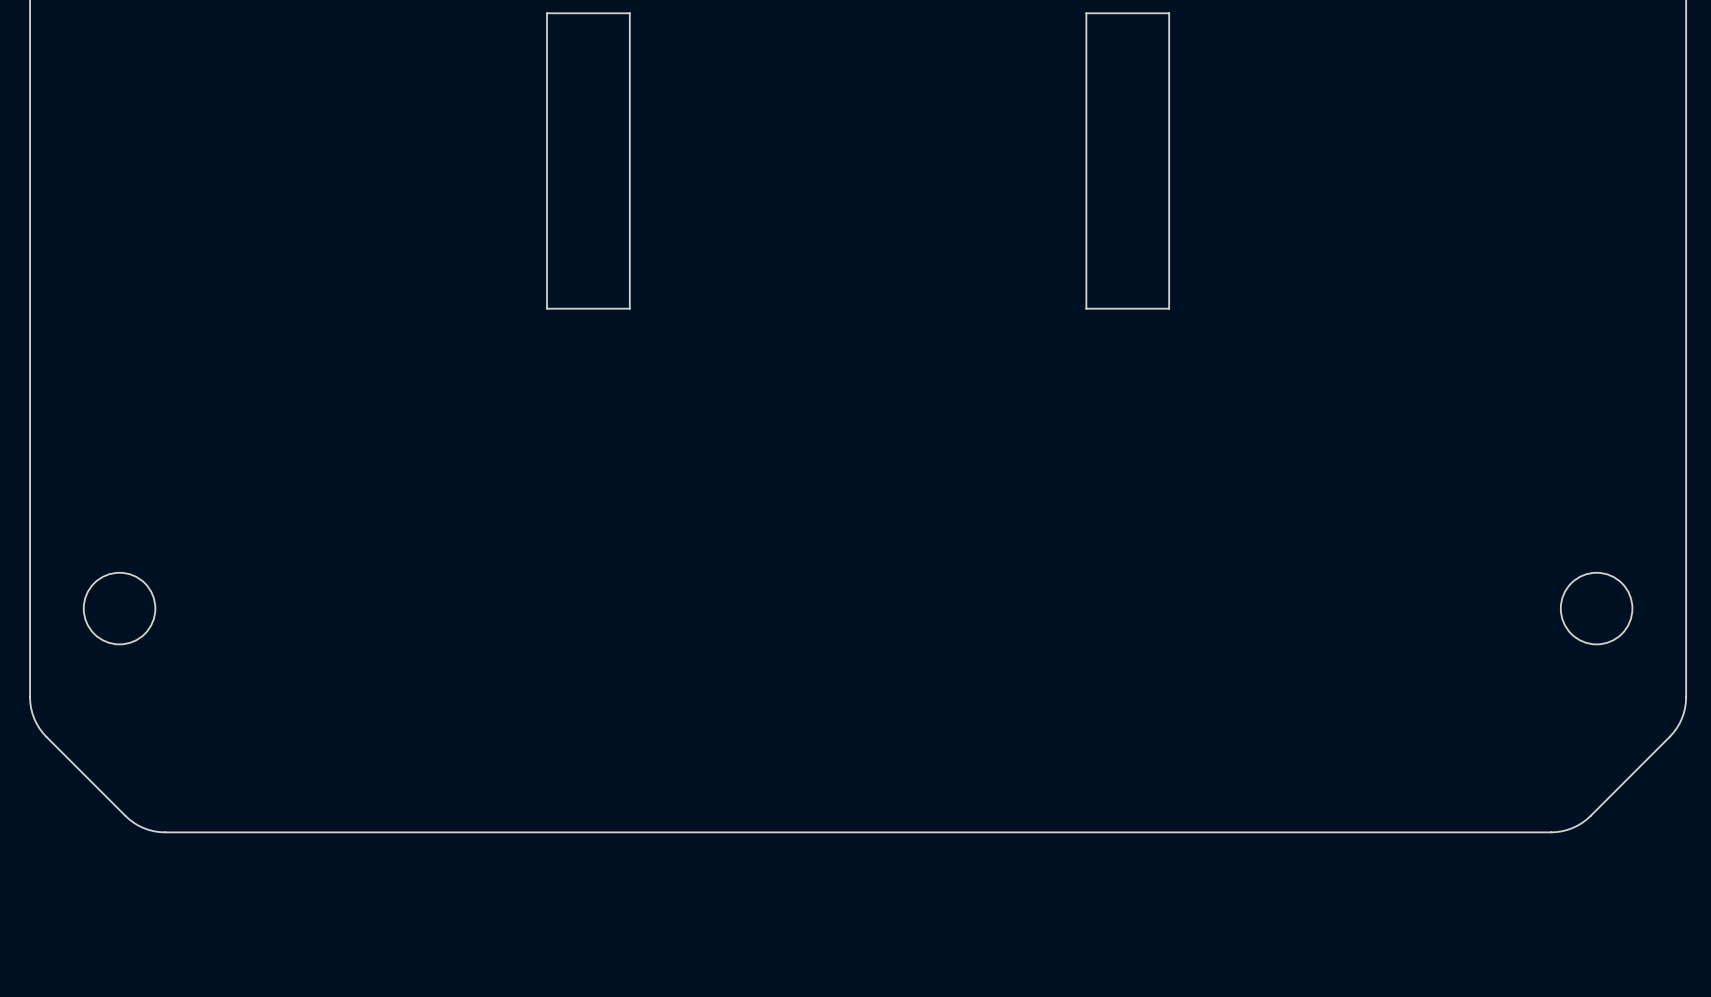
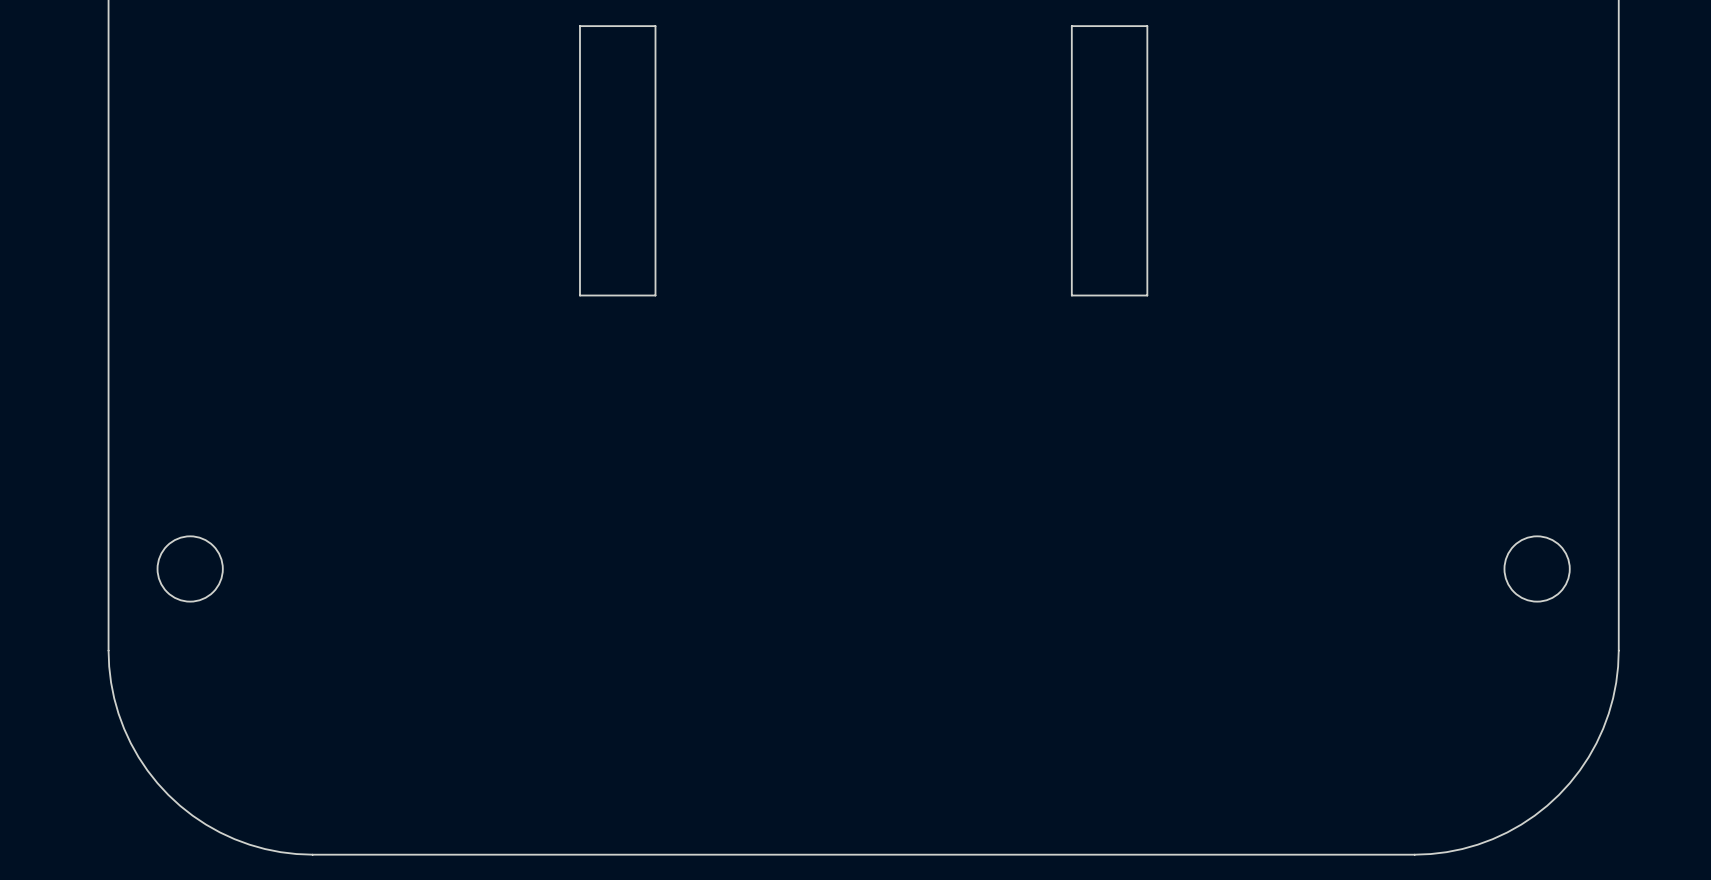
board edge: (30, 697) (32, 713) (42, 732) (125, 815) (143, 828) (165, 832) (1556, 832) (1572, 828) (1586, 819) (1669, 736) (1681, 718) (1686, 697) -> (108, 649) (111, 682) (124, 728) (138, 757) (168, 794) (192, 815) (234, 839) (265, 849) (312, 854) (1414, 854) (1446, 852) (1477, 844) (1507, 832) (1534, 815) (1569, 783) (1588, 757) (1608, 713) (1616, 682) (1618, 649)

